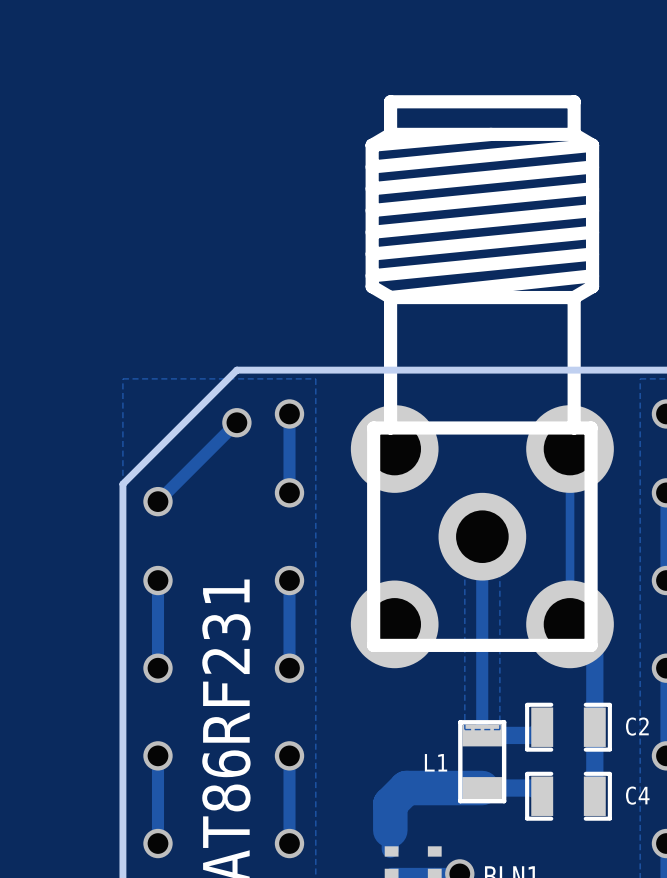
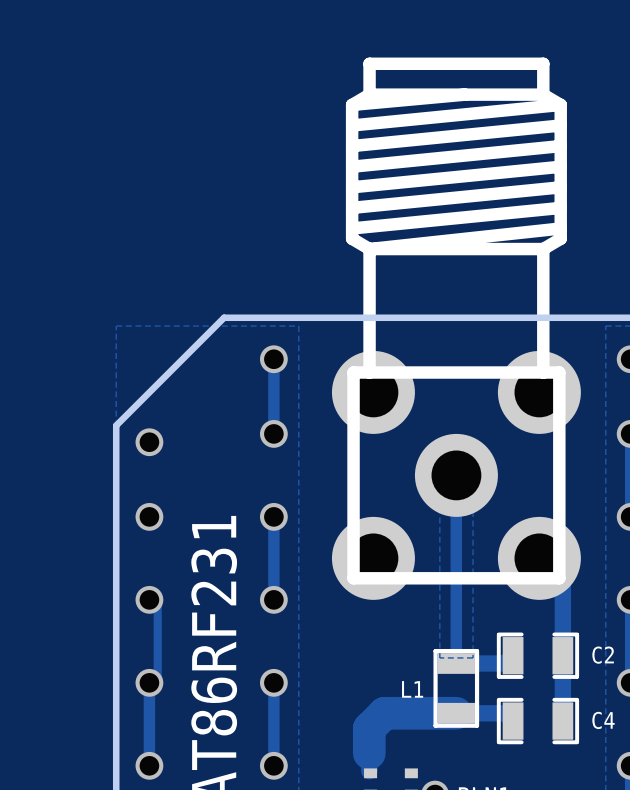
track: (236, 422) (157, 501) -> none
via: (236, 422) -> none
track: (570, 449) (570, 624) -> none
track: (157, 580) (157, 668) -> (157, 599) (157, 682)

